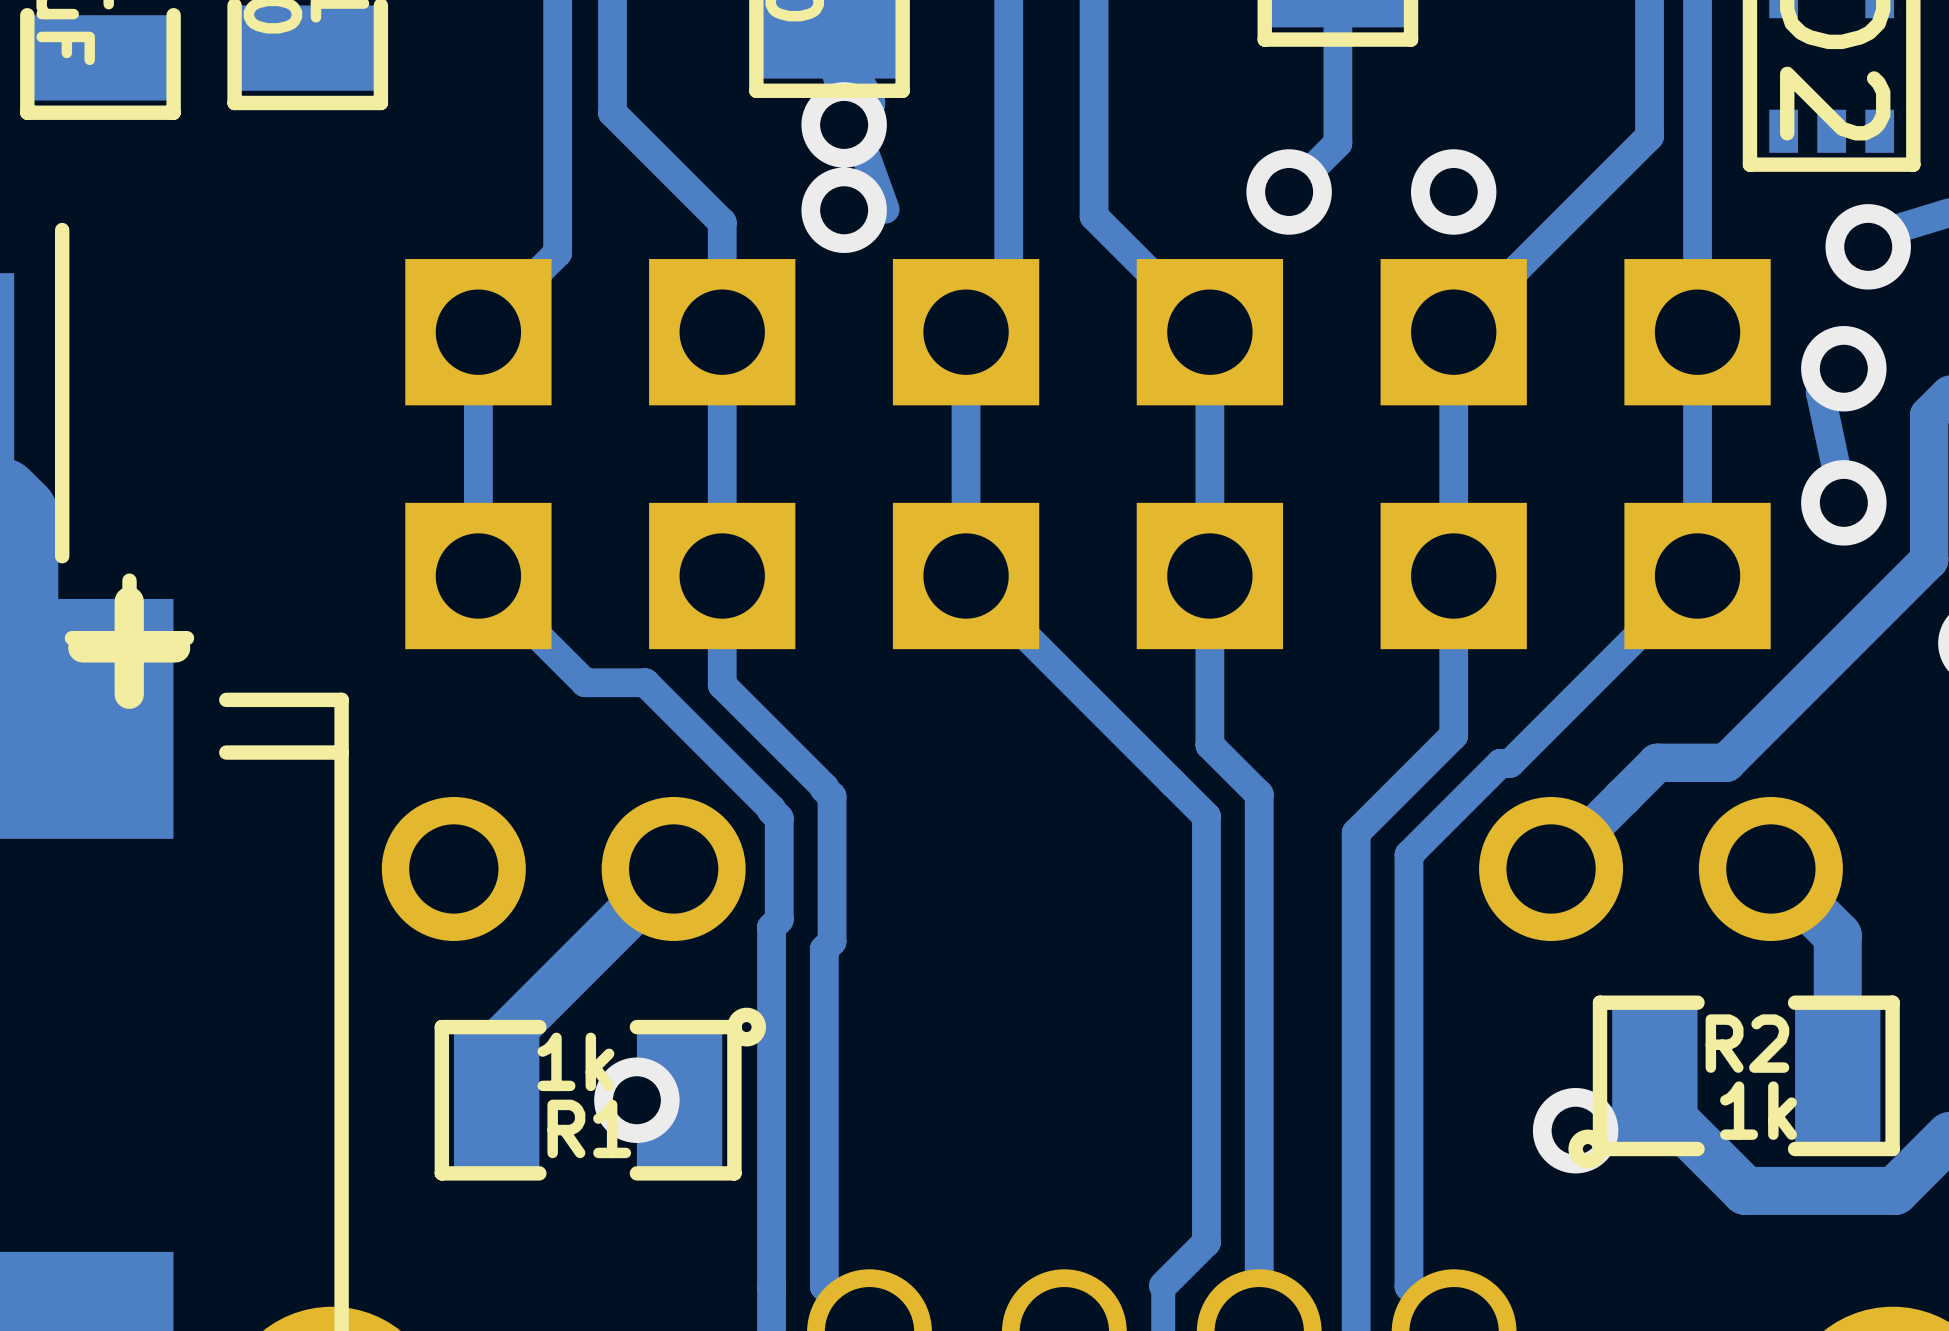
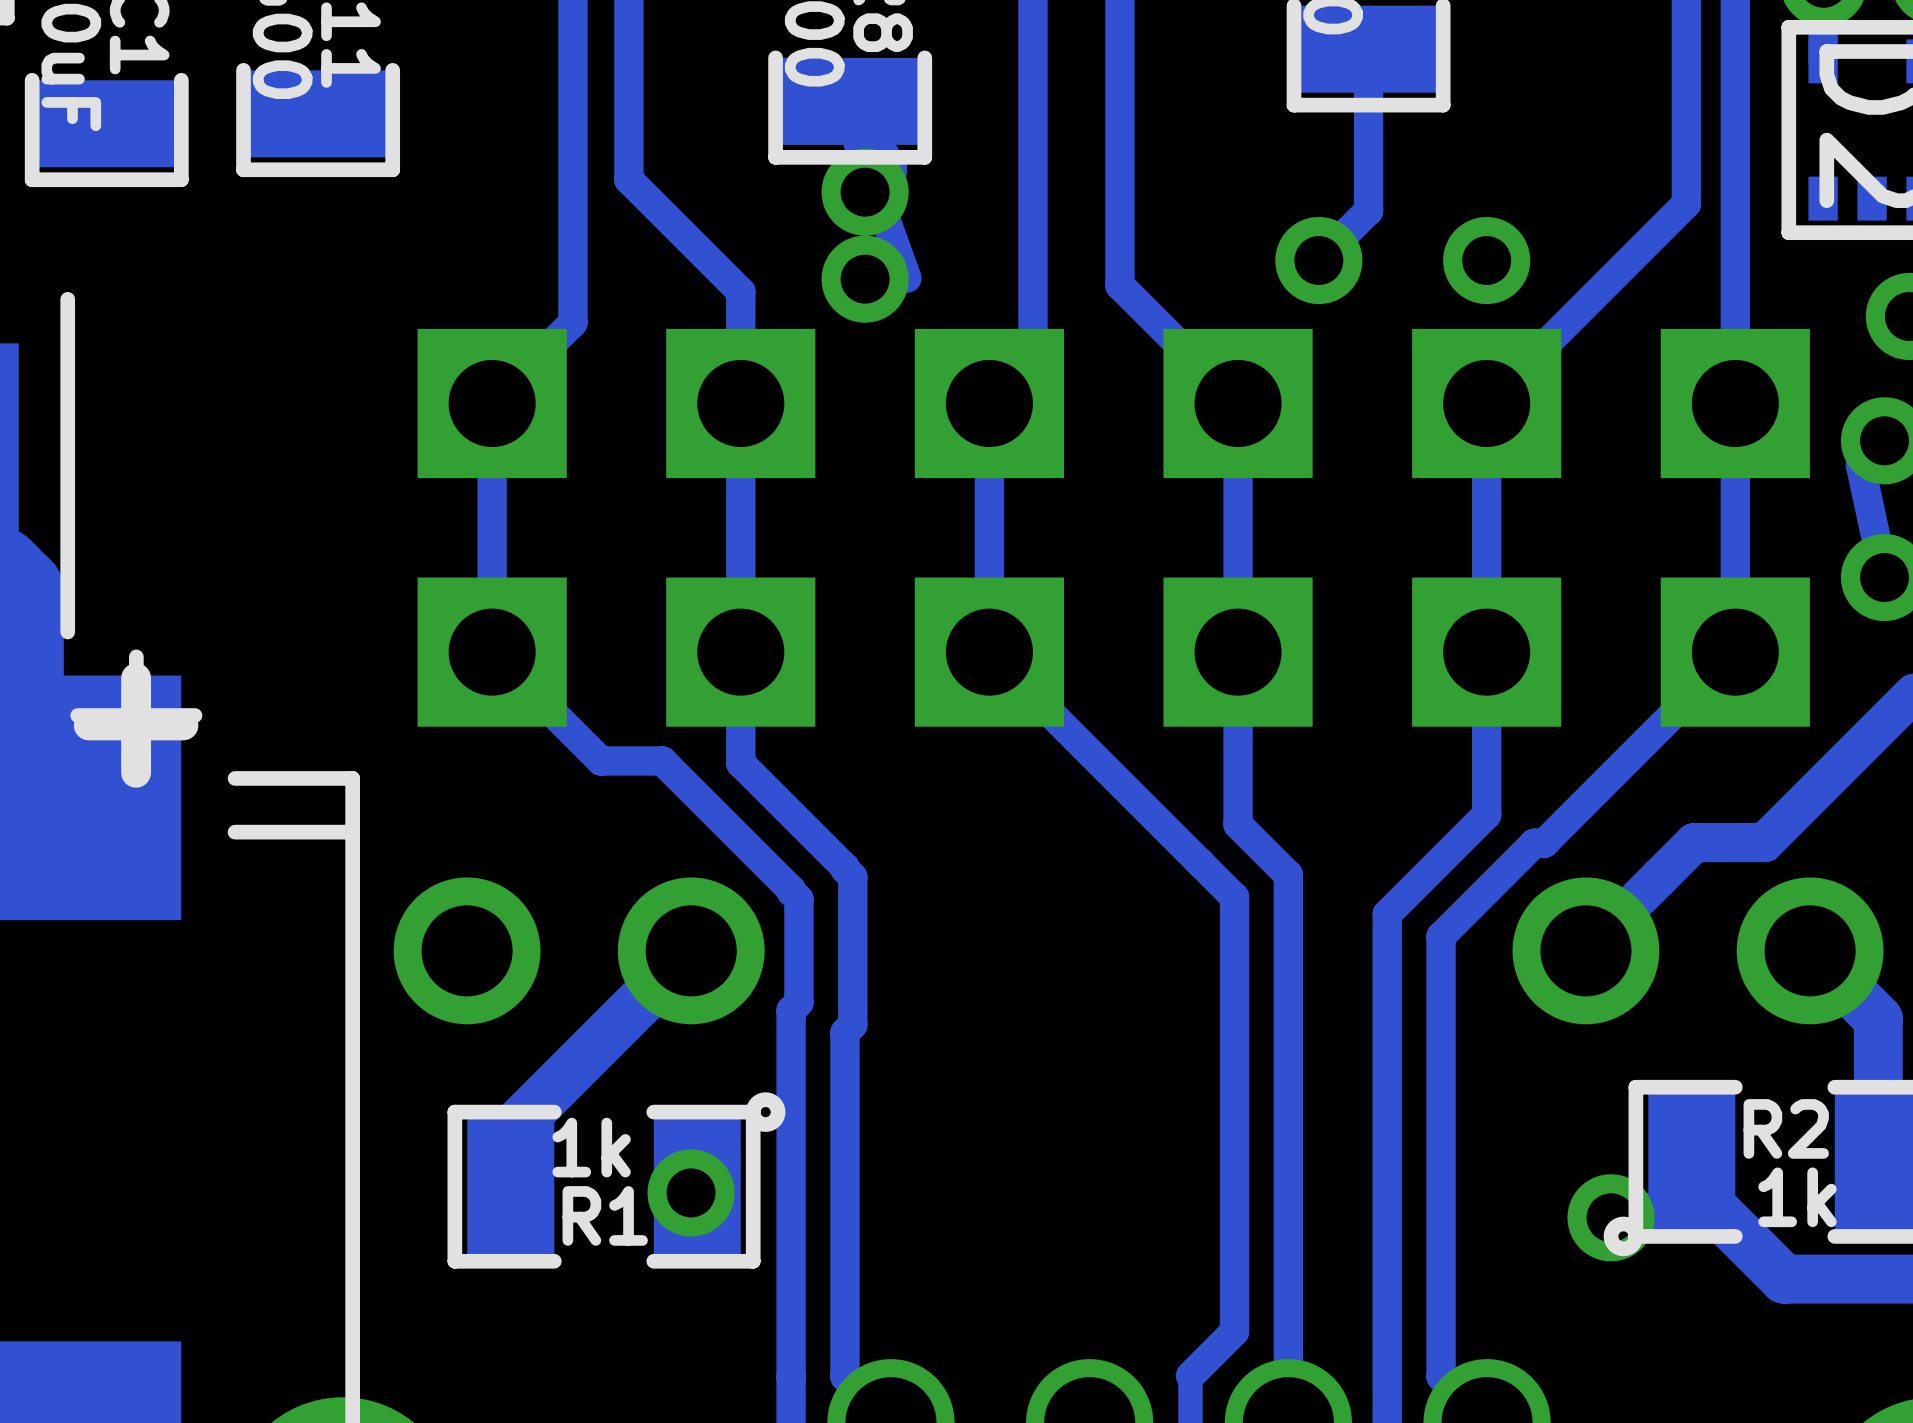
via position: (636, 1100) -> (691, 1192)

